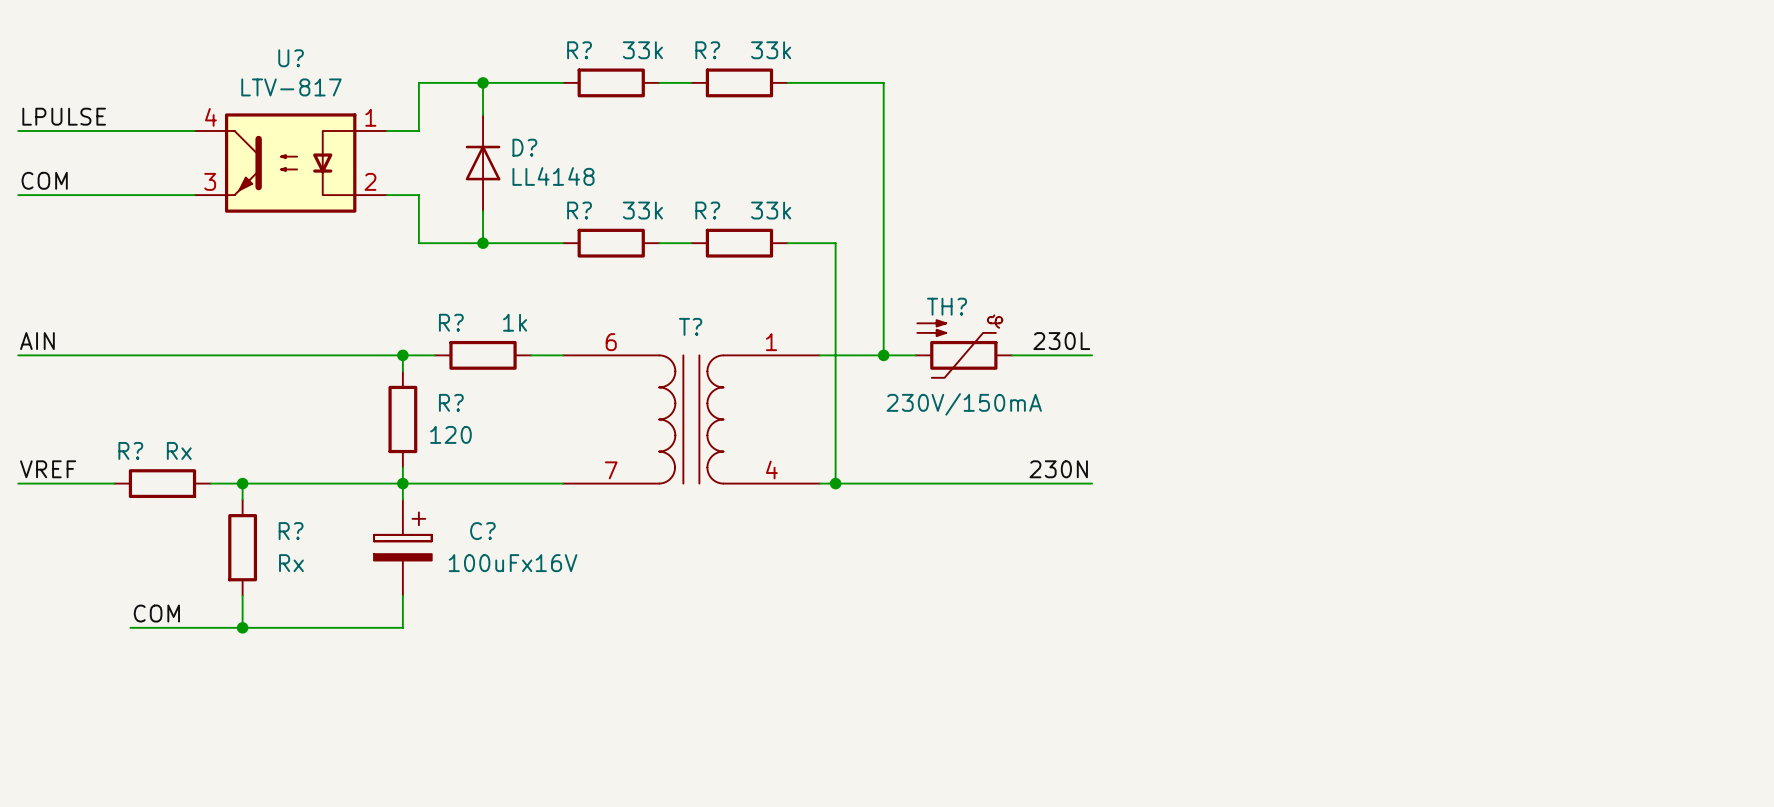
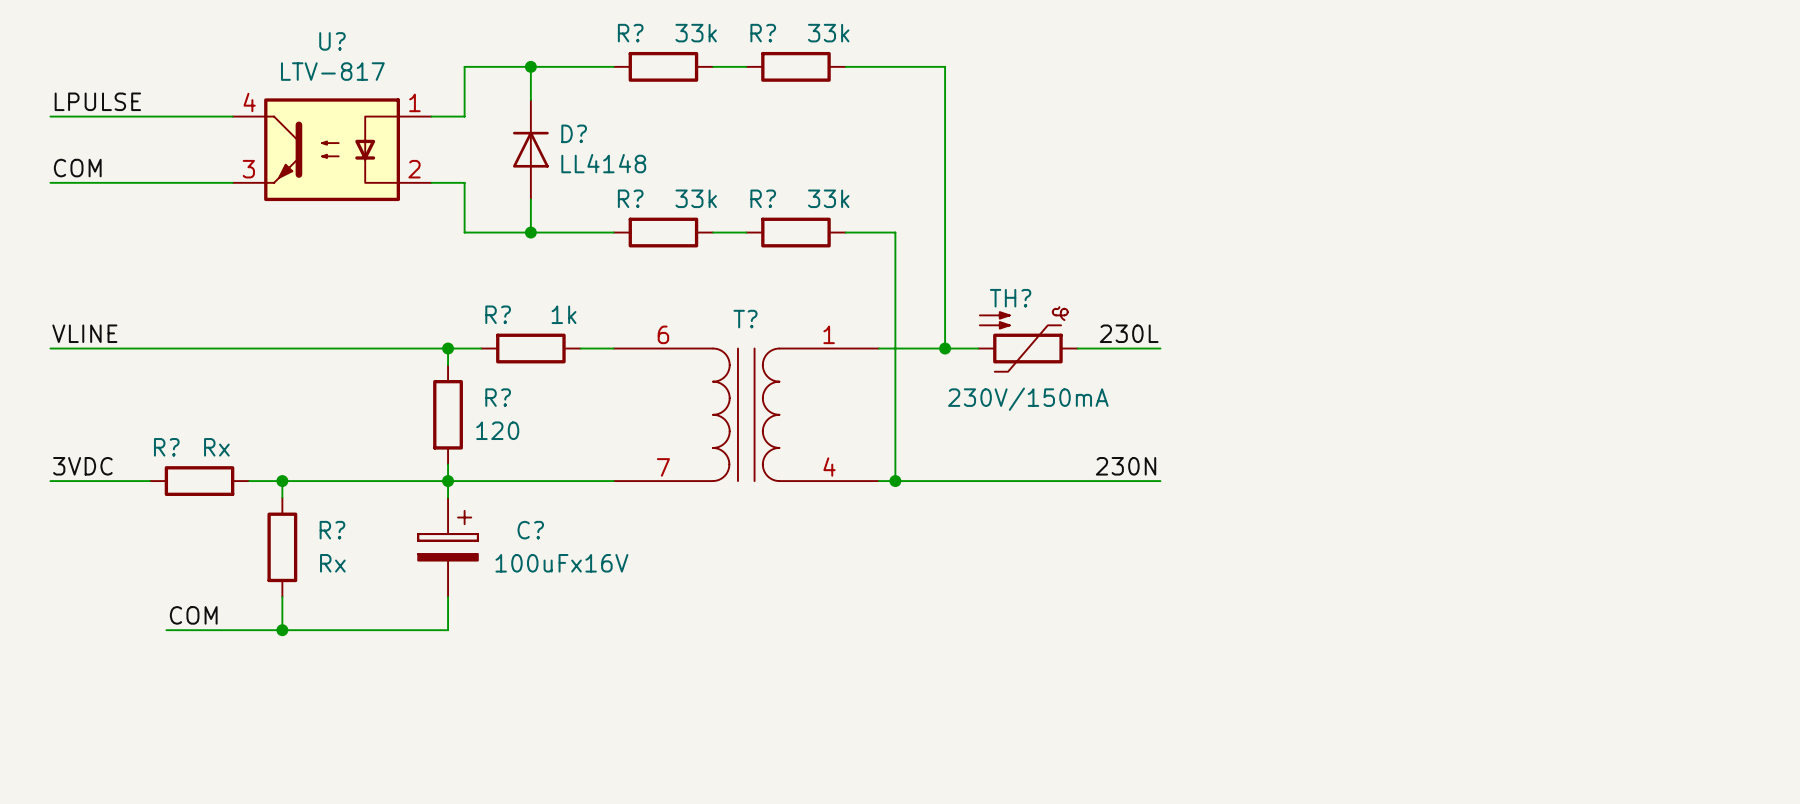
label: AIN (37, 341) -> VLINE (84, 333)
label: VREF (48, 469) -> 3VDC (82, 466)

